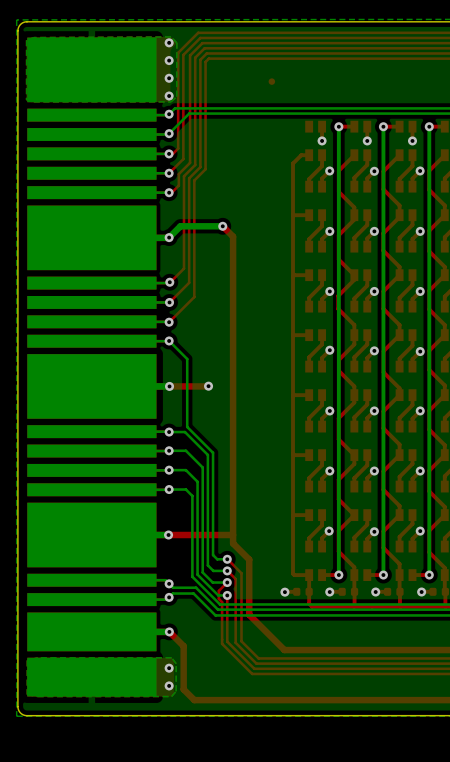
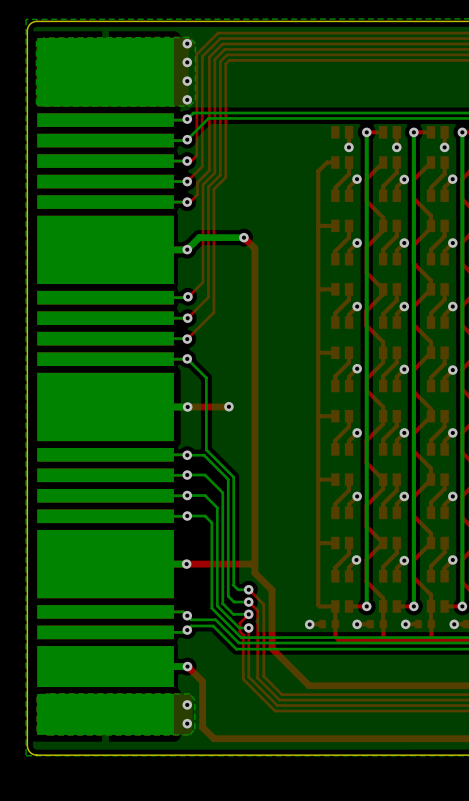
part: (271, 81) -> none

